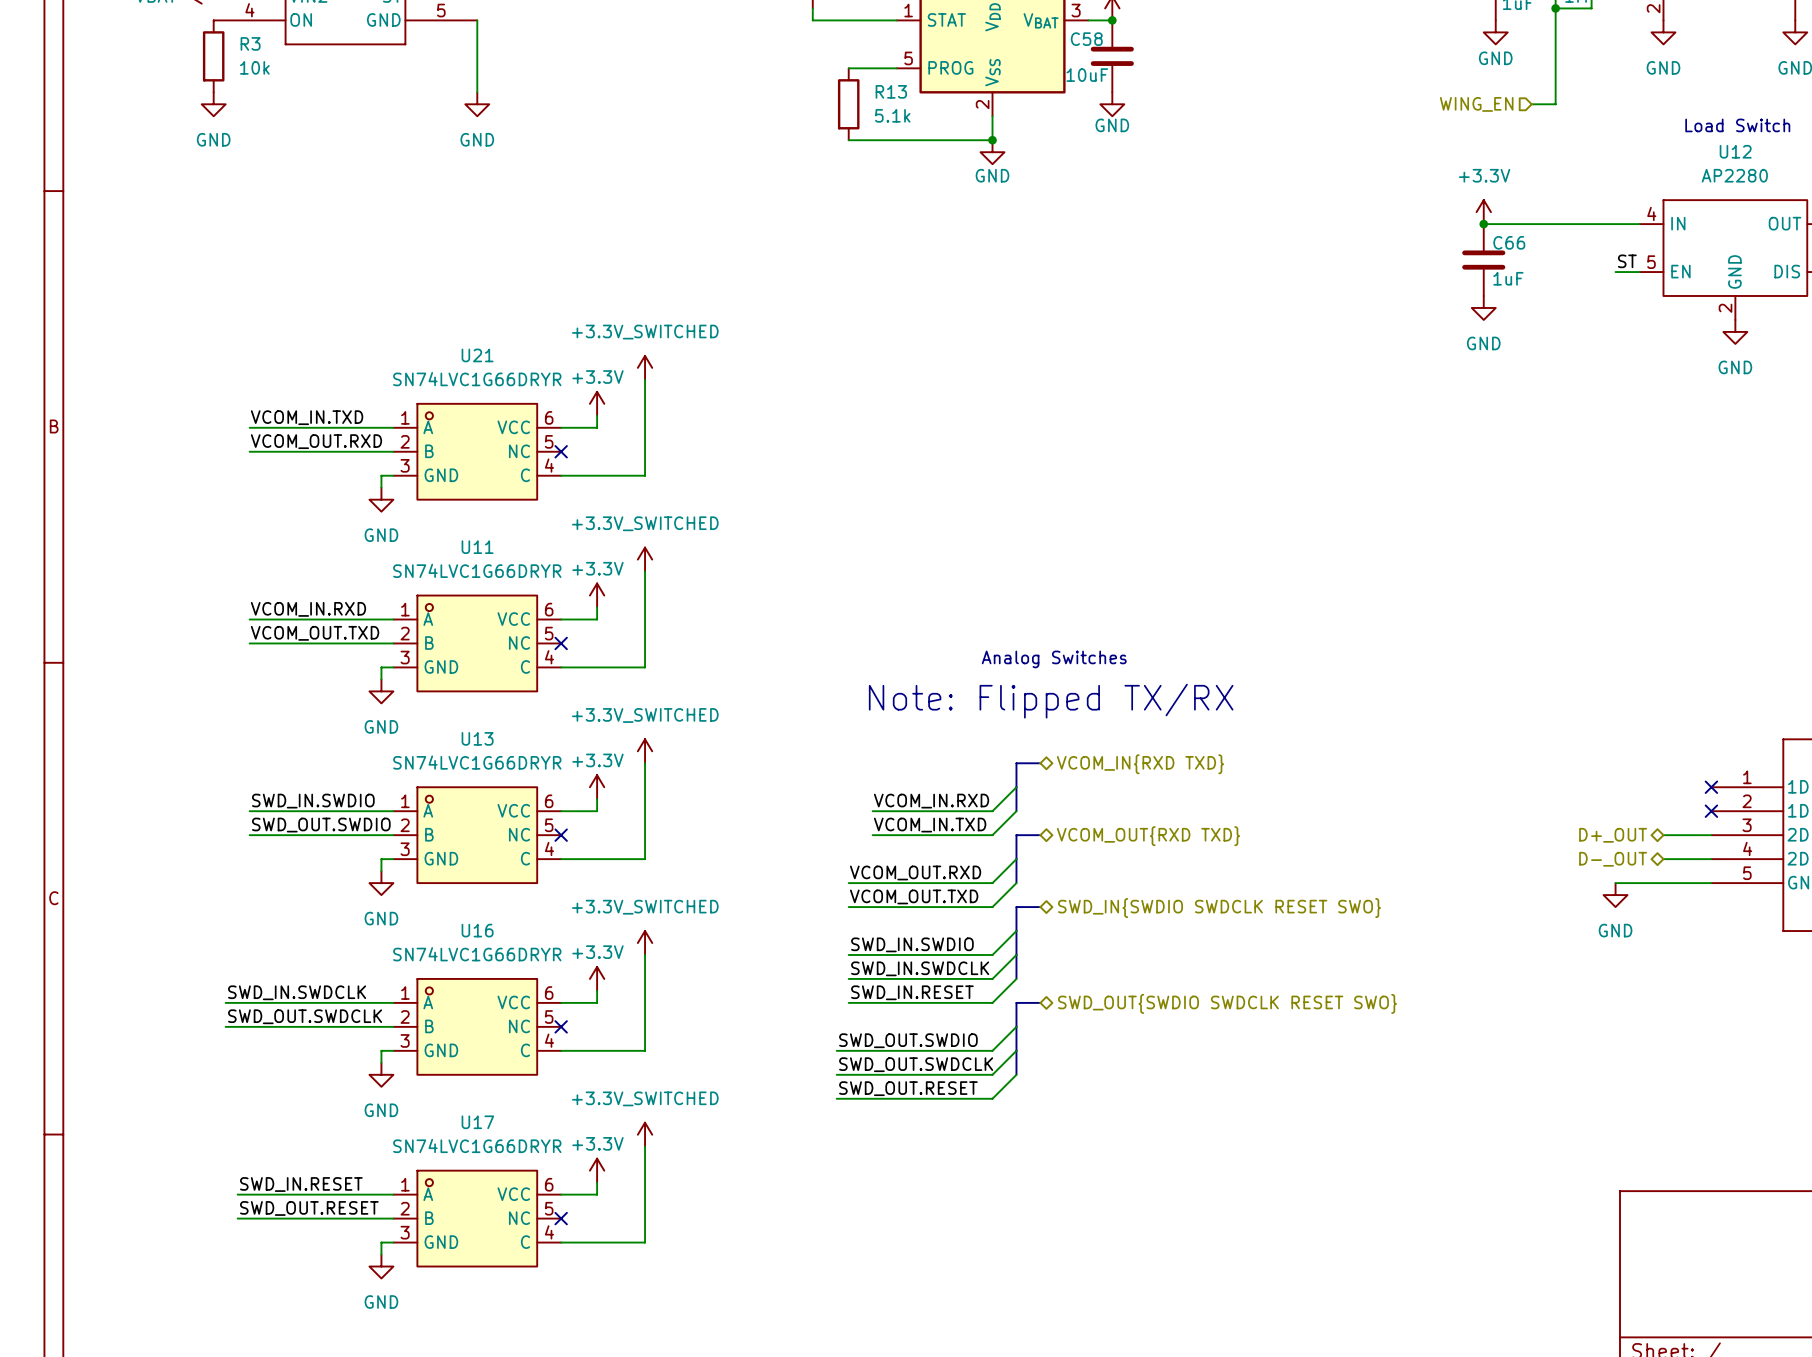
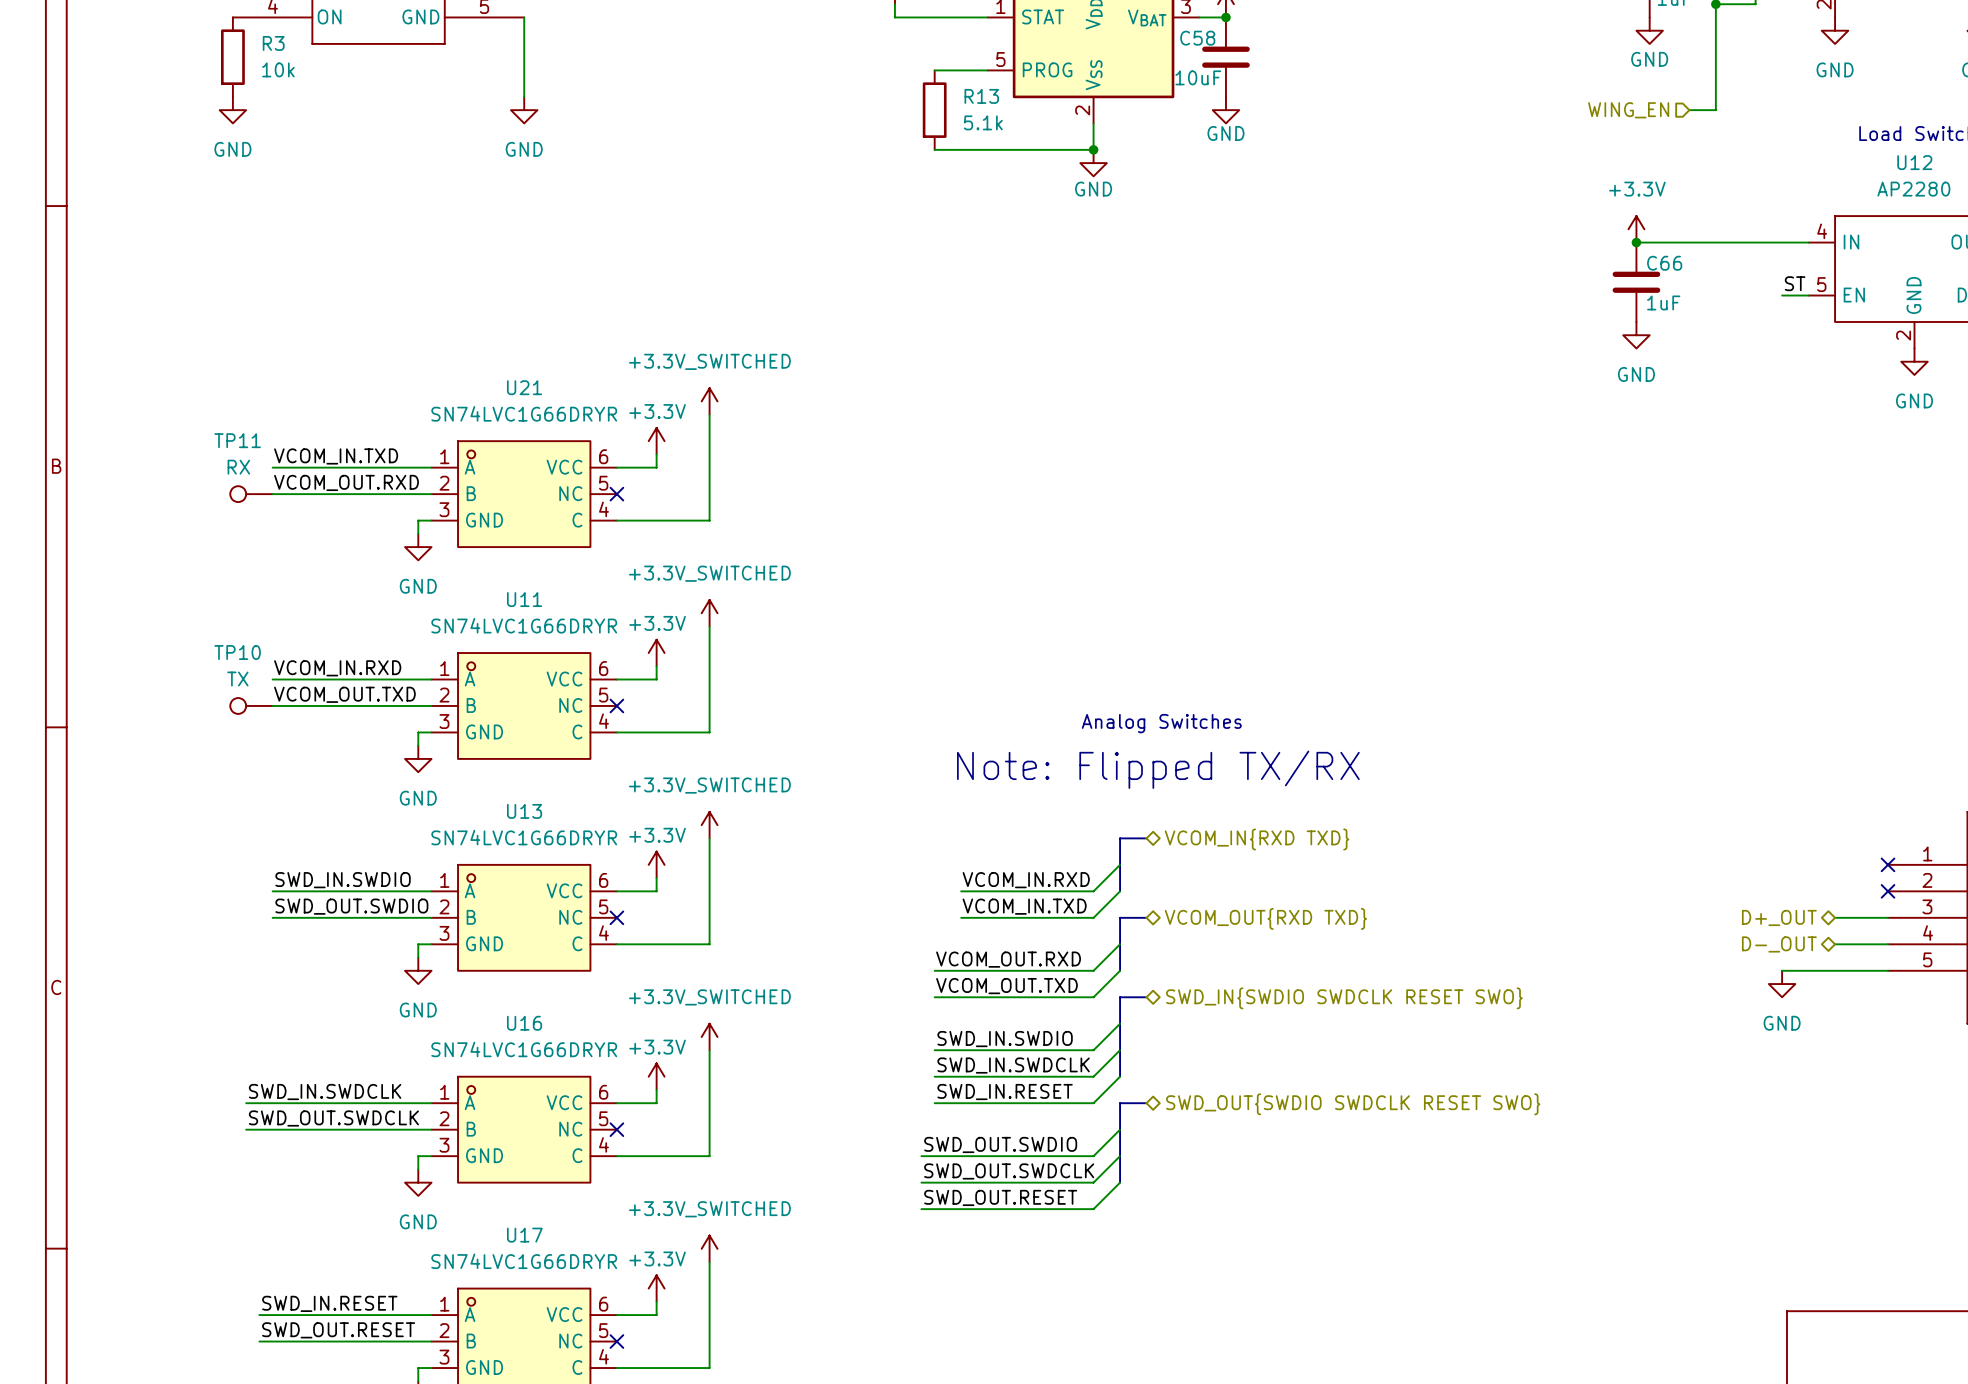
TP11: none -> RX (251, 494)
TP10: none -> TX (251, 705)

